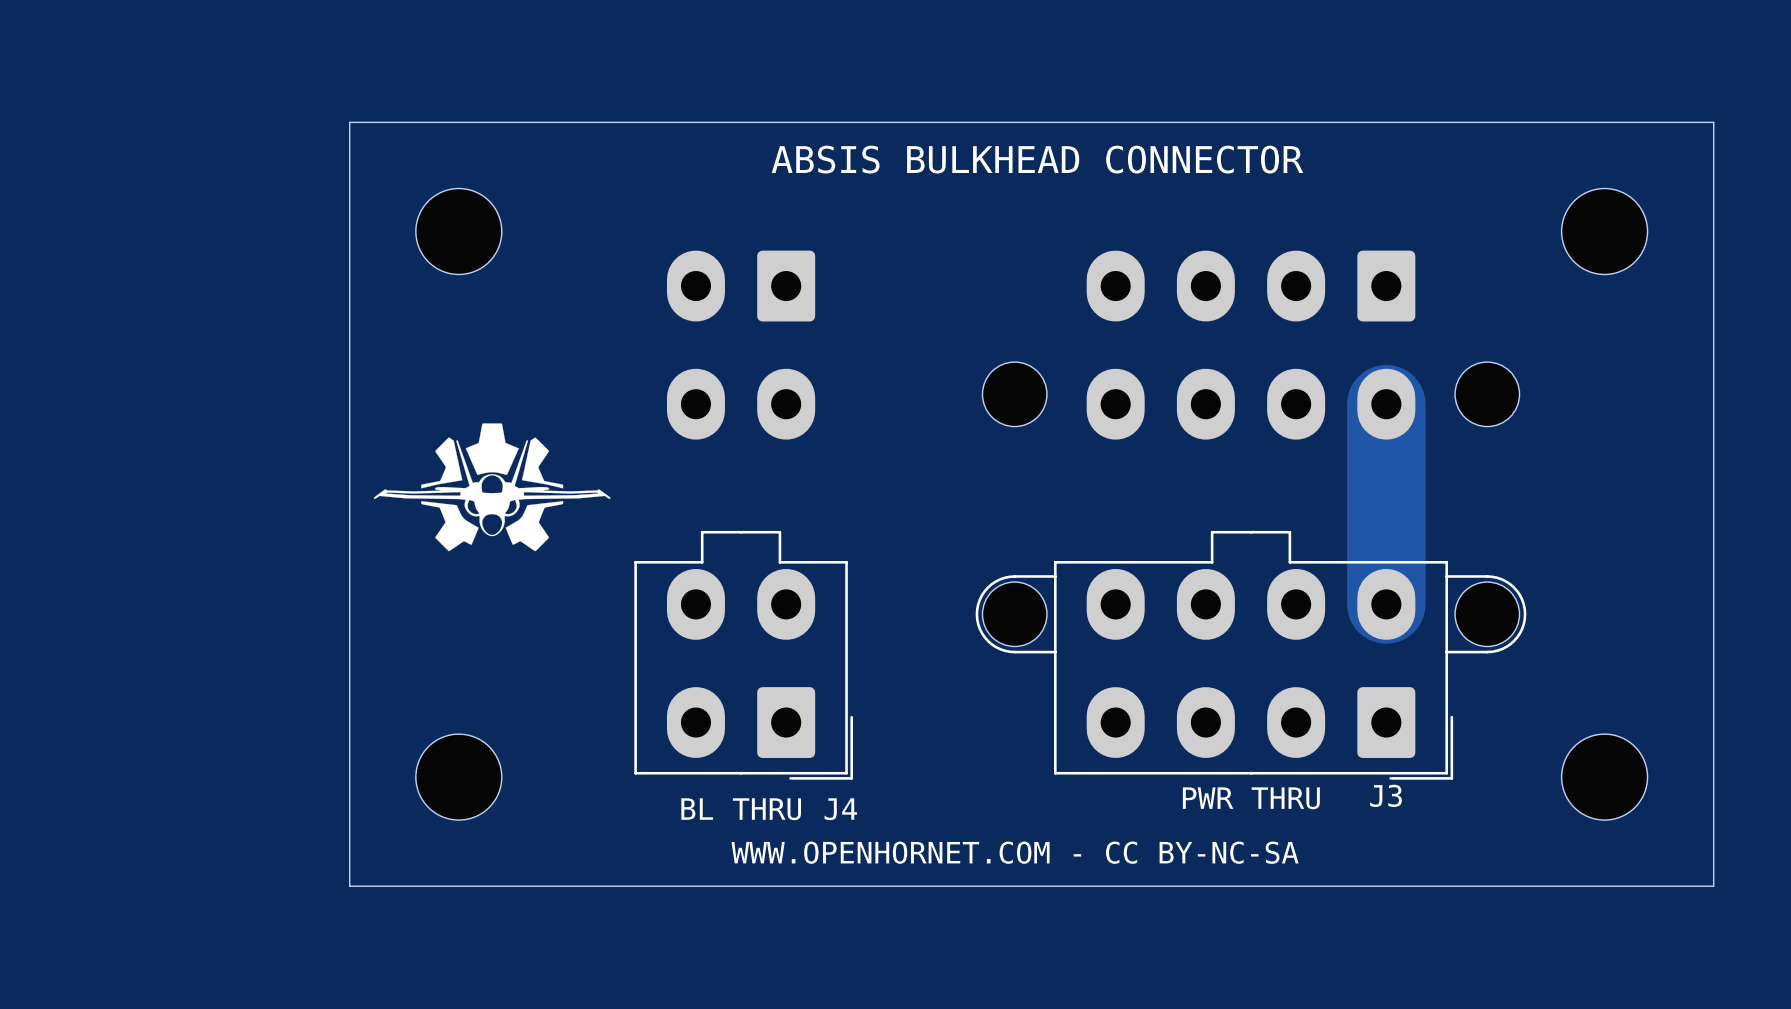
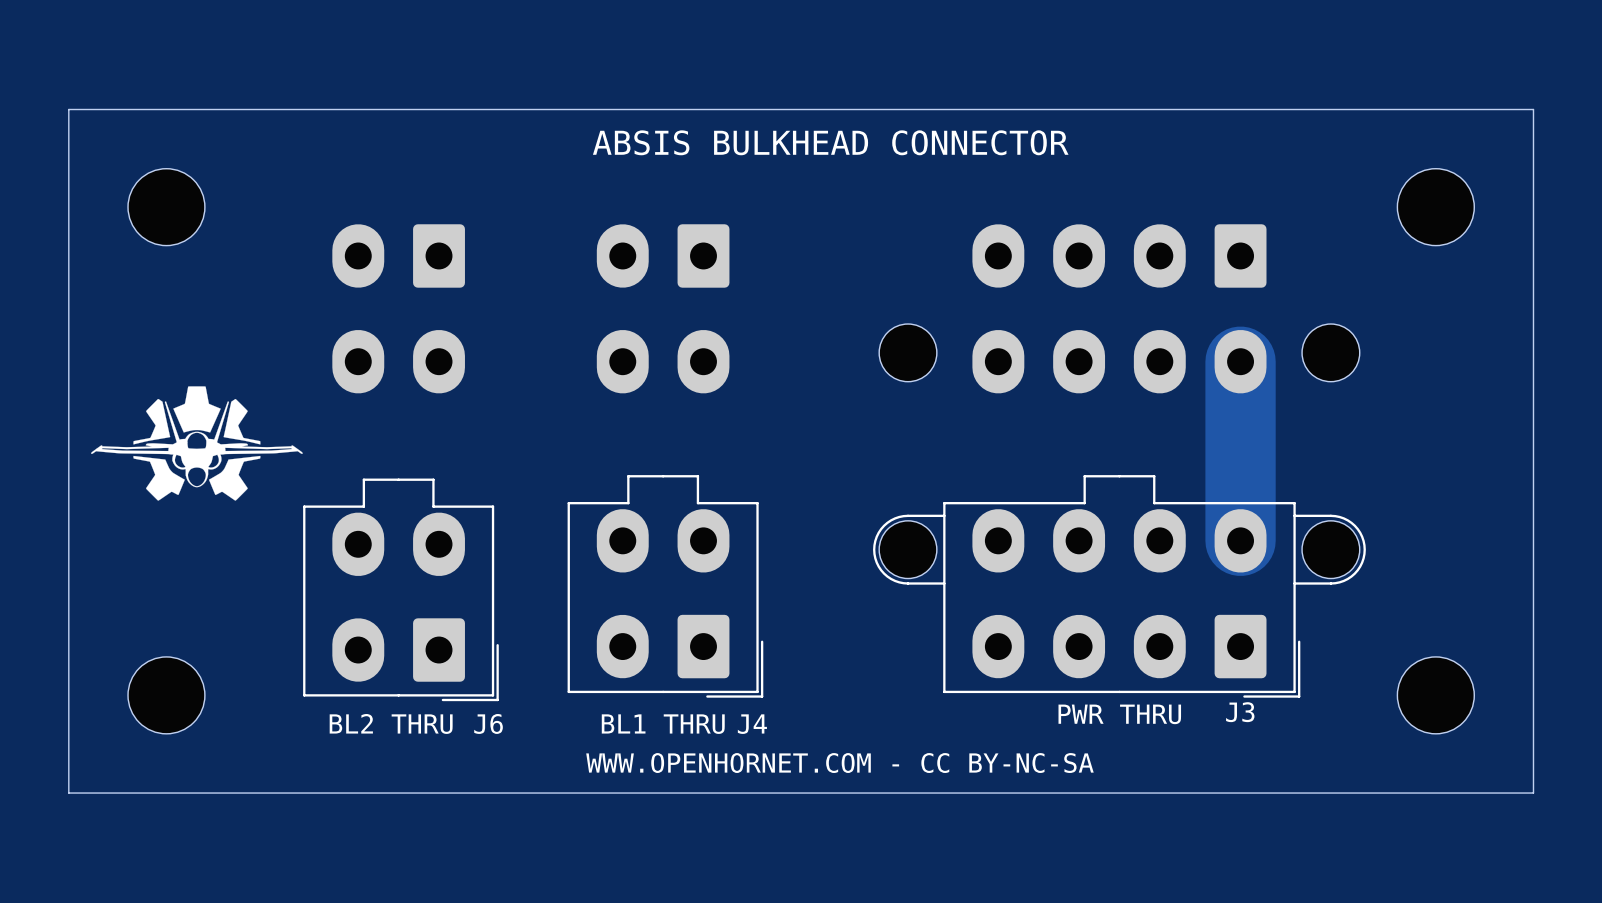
board edge: (349, 122) (349, 886) -> (312, 109) (68, 109) (68, 793) (312, 793)
text position: ABSIS BULKHEAD CONNECTOR (1037, 159) -> ABSIS BULKHEAD CONNECTOR (830, 142)
part position: (458, 231) -> (166, 207)
part: none -> (398, 308)
drawing position: (492, 487) -> (196, 443)
J6: none -> BL2 THRU (400, 589)
part position: (458, 777) -> (166, 695)
J4 value: BL THRU (741, 809) -> BL1 THRU (663, 724)
text position: WWW.OPENHORNET.COM - CC BY-NC-SA (1015, 852) -> WWW.OPENHORNET.COM - CC BY-NC-SA (839, 763)

